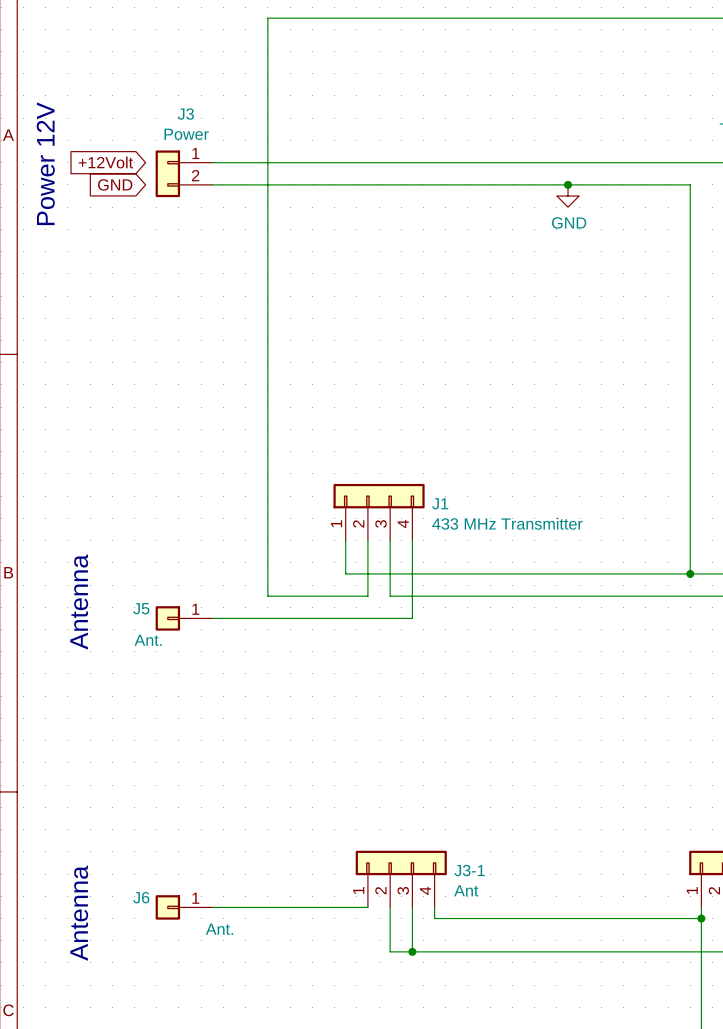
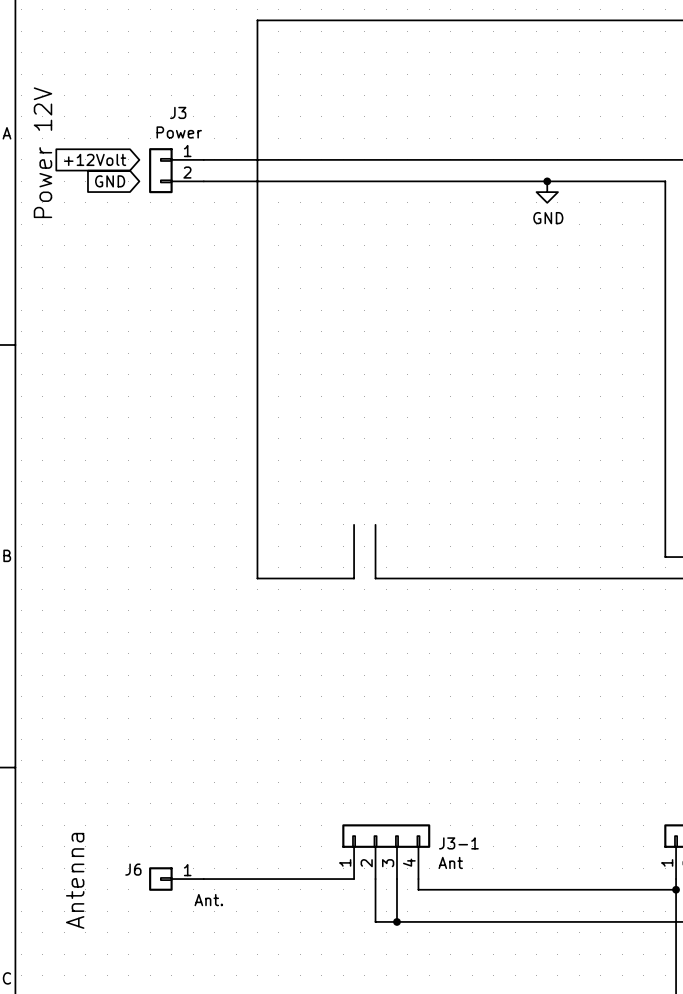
J1: 433 MHz Transmitter (379, 512) -> none
wire: (345, 540) (345, 573) (690, 573) -> none
wire: (412, 540) (412, 618) (212, 618) -> none
junction: (690, 573) -> none
text: Antenna (79, 601) -> none
J5: Ant. (183, 618) -> none

